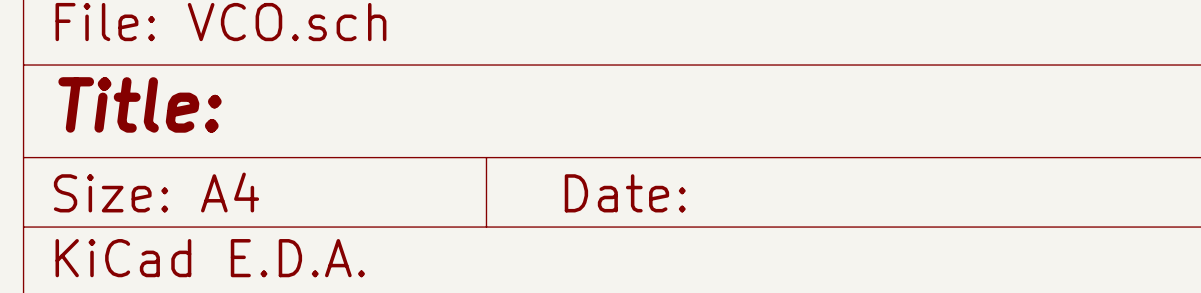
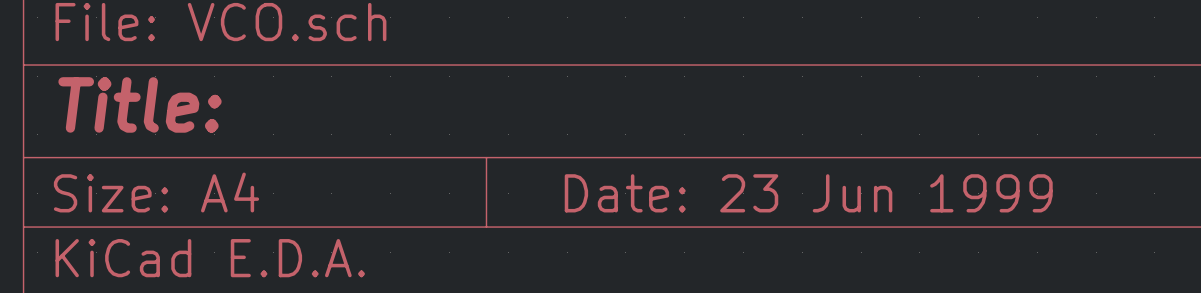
title block: Date: (625, 193) -> Date: 23 Jun 1999 (808, 193)

